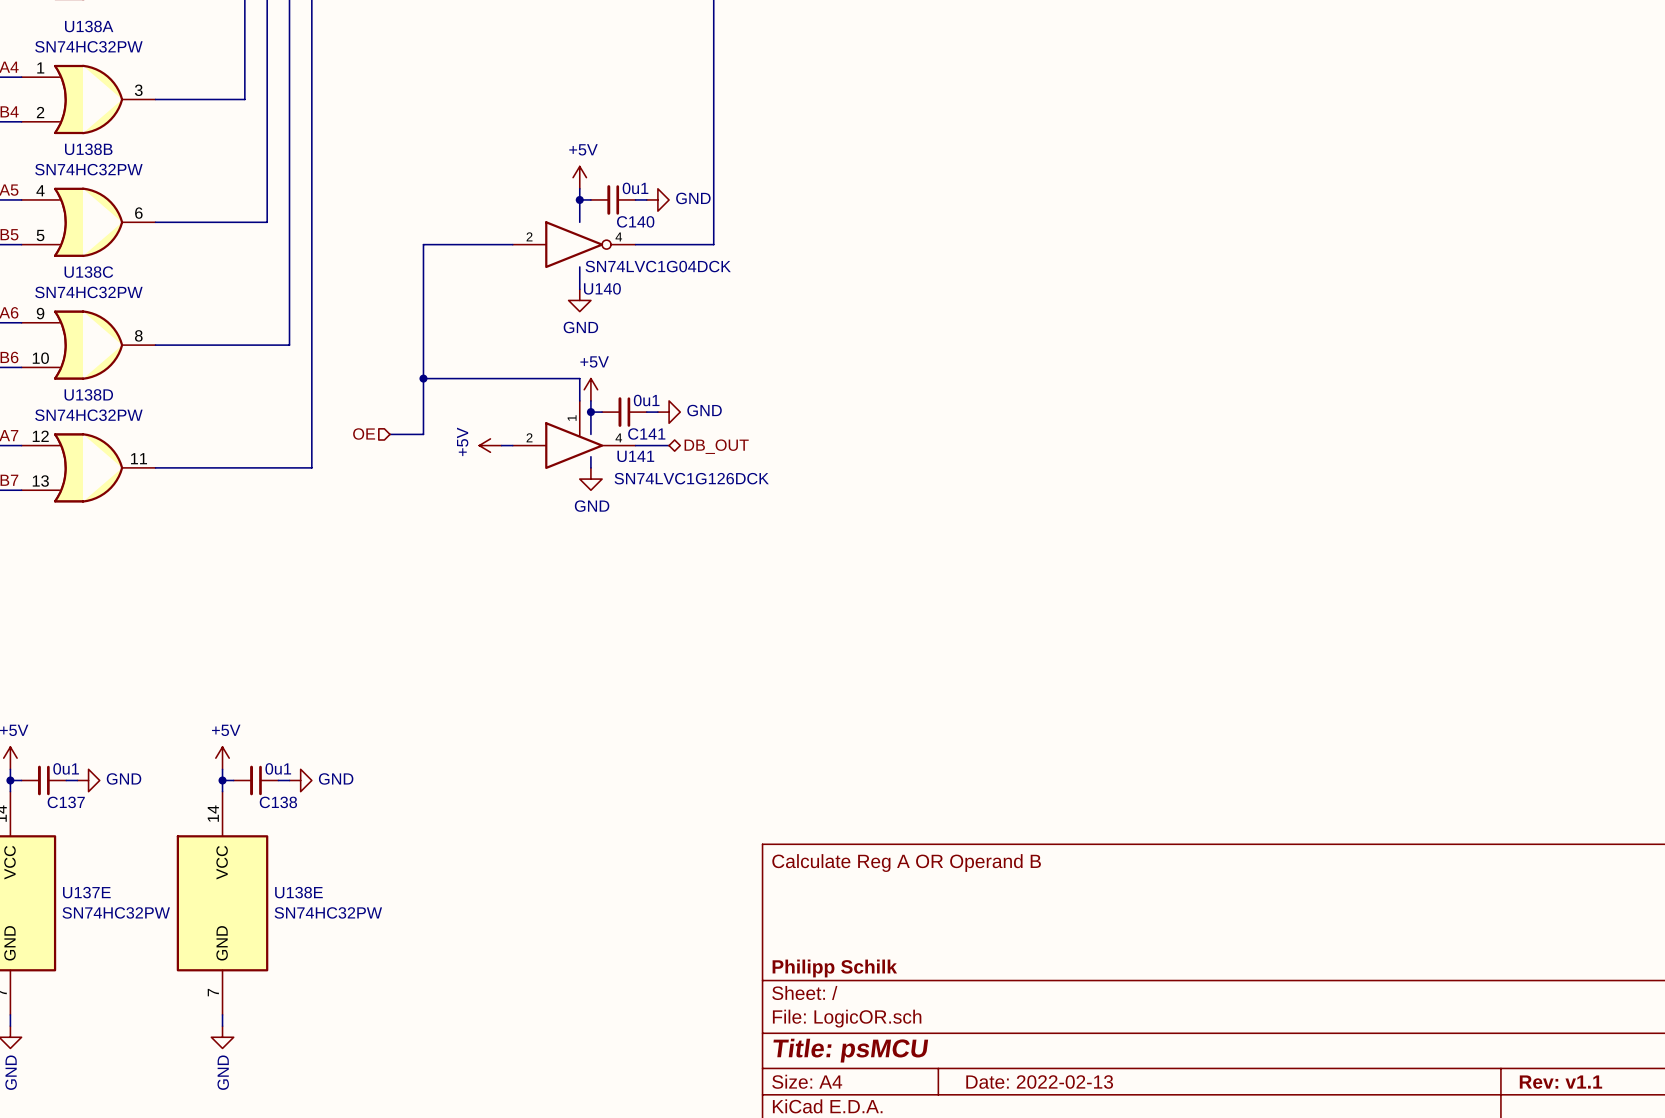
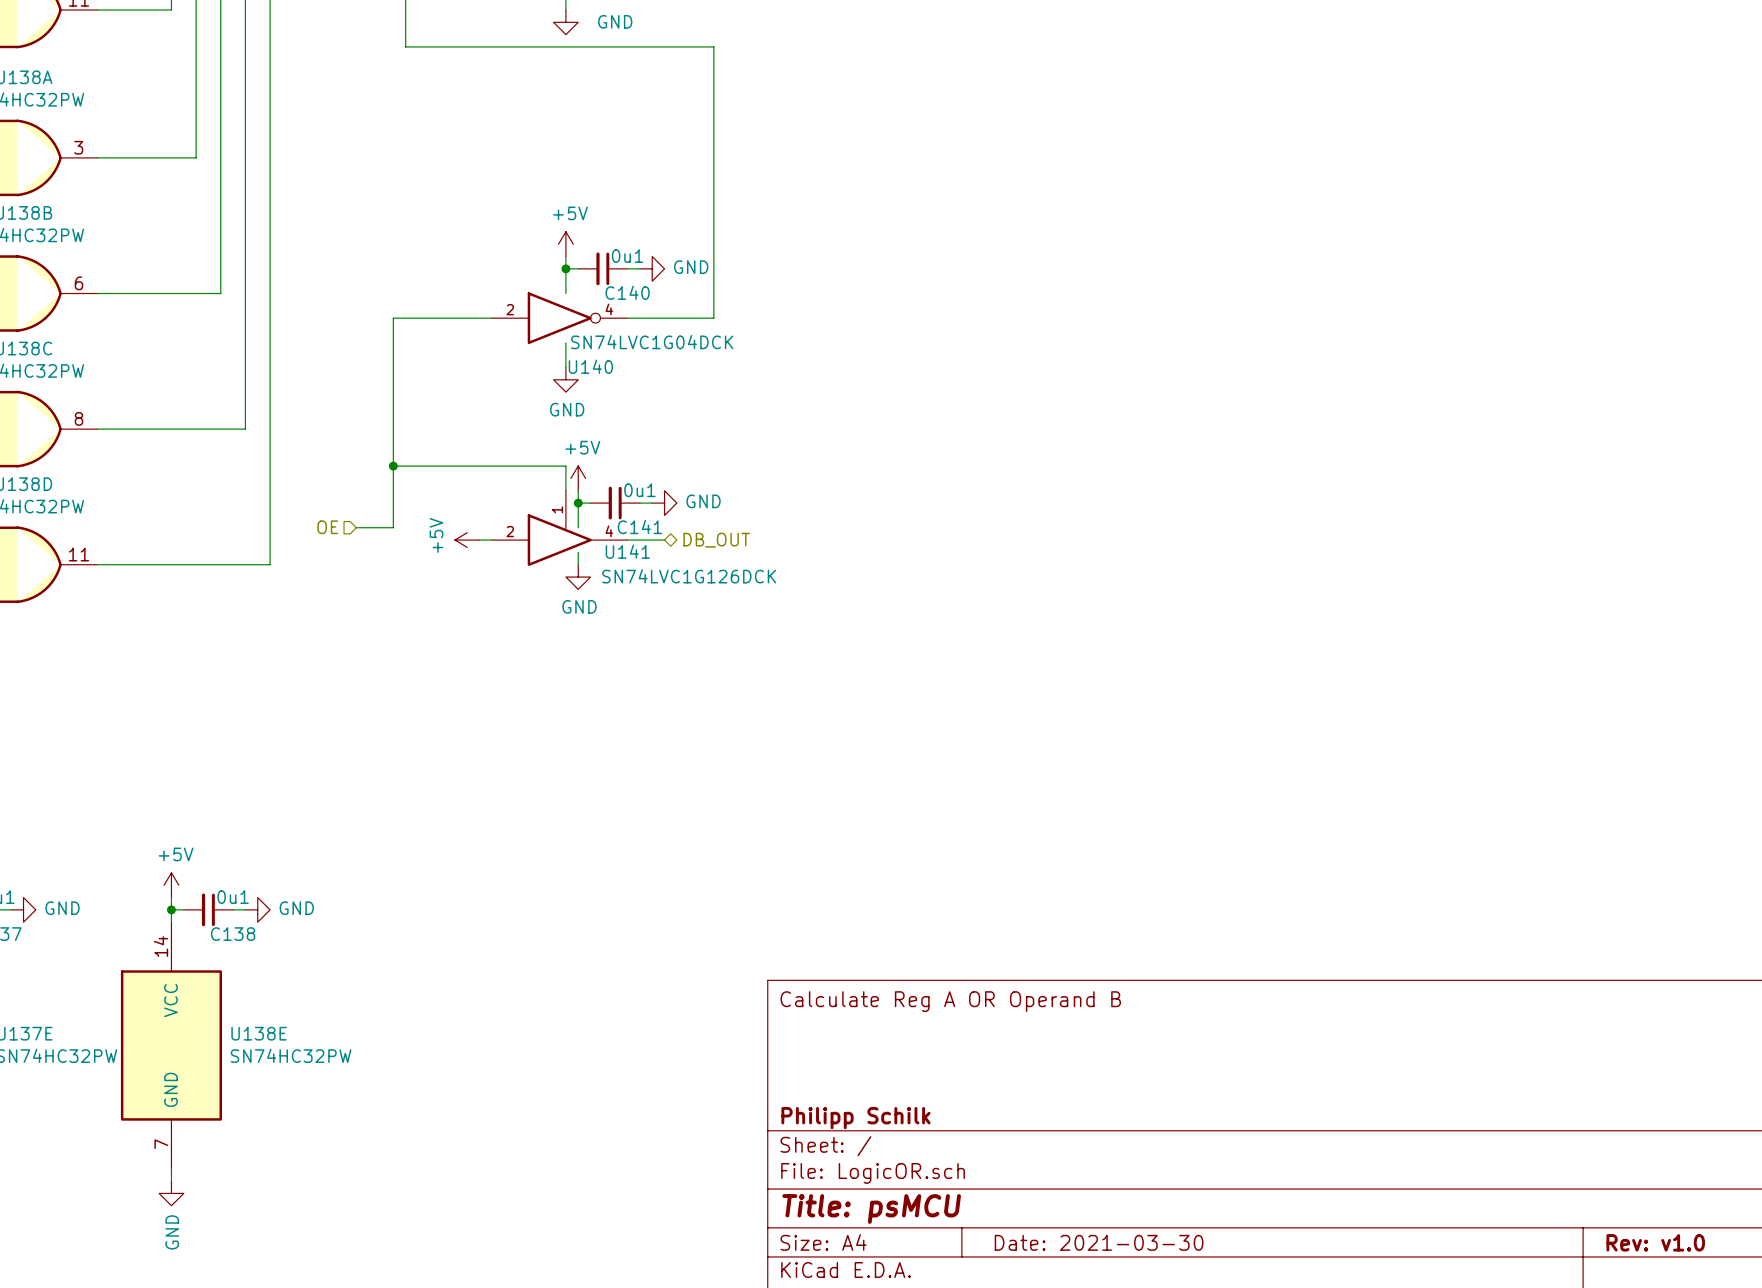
title block: Date: 2022-02-13 (1039, 1082) -> Date: 2021-03-30 (1099, 1242)
title block: Rev: v1.1 (1560, 1082) -> Rev: v1.0 (1655, 1242)

